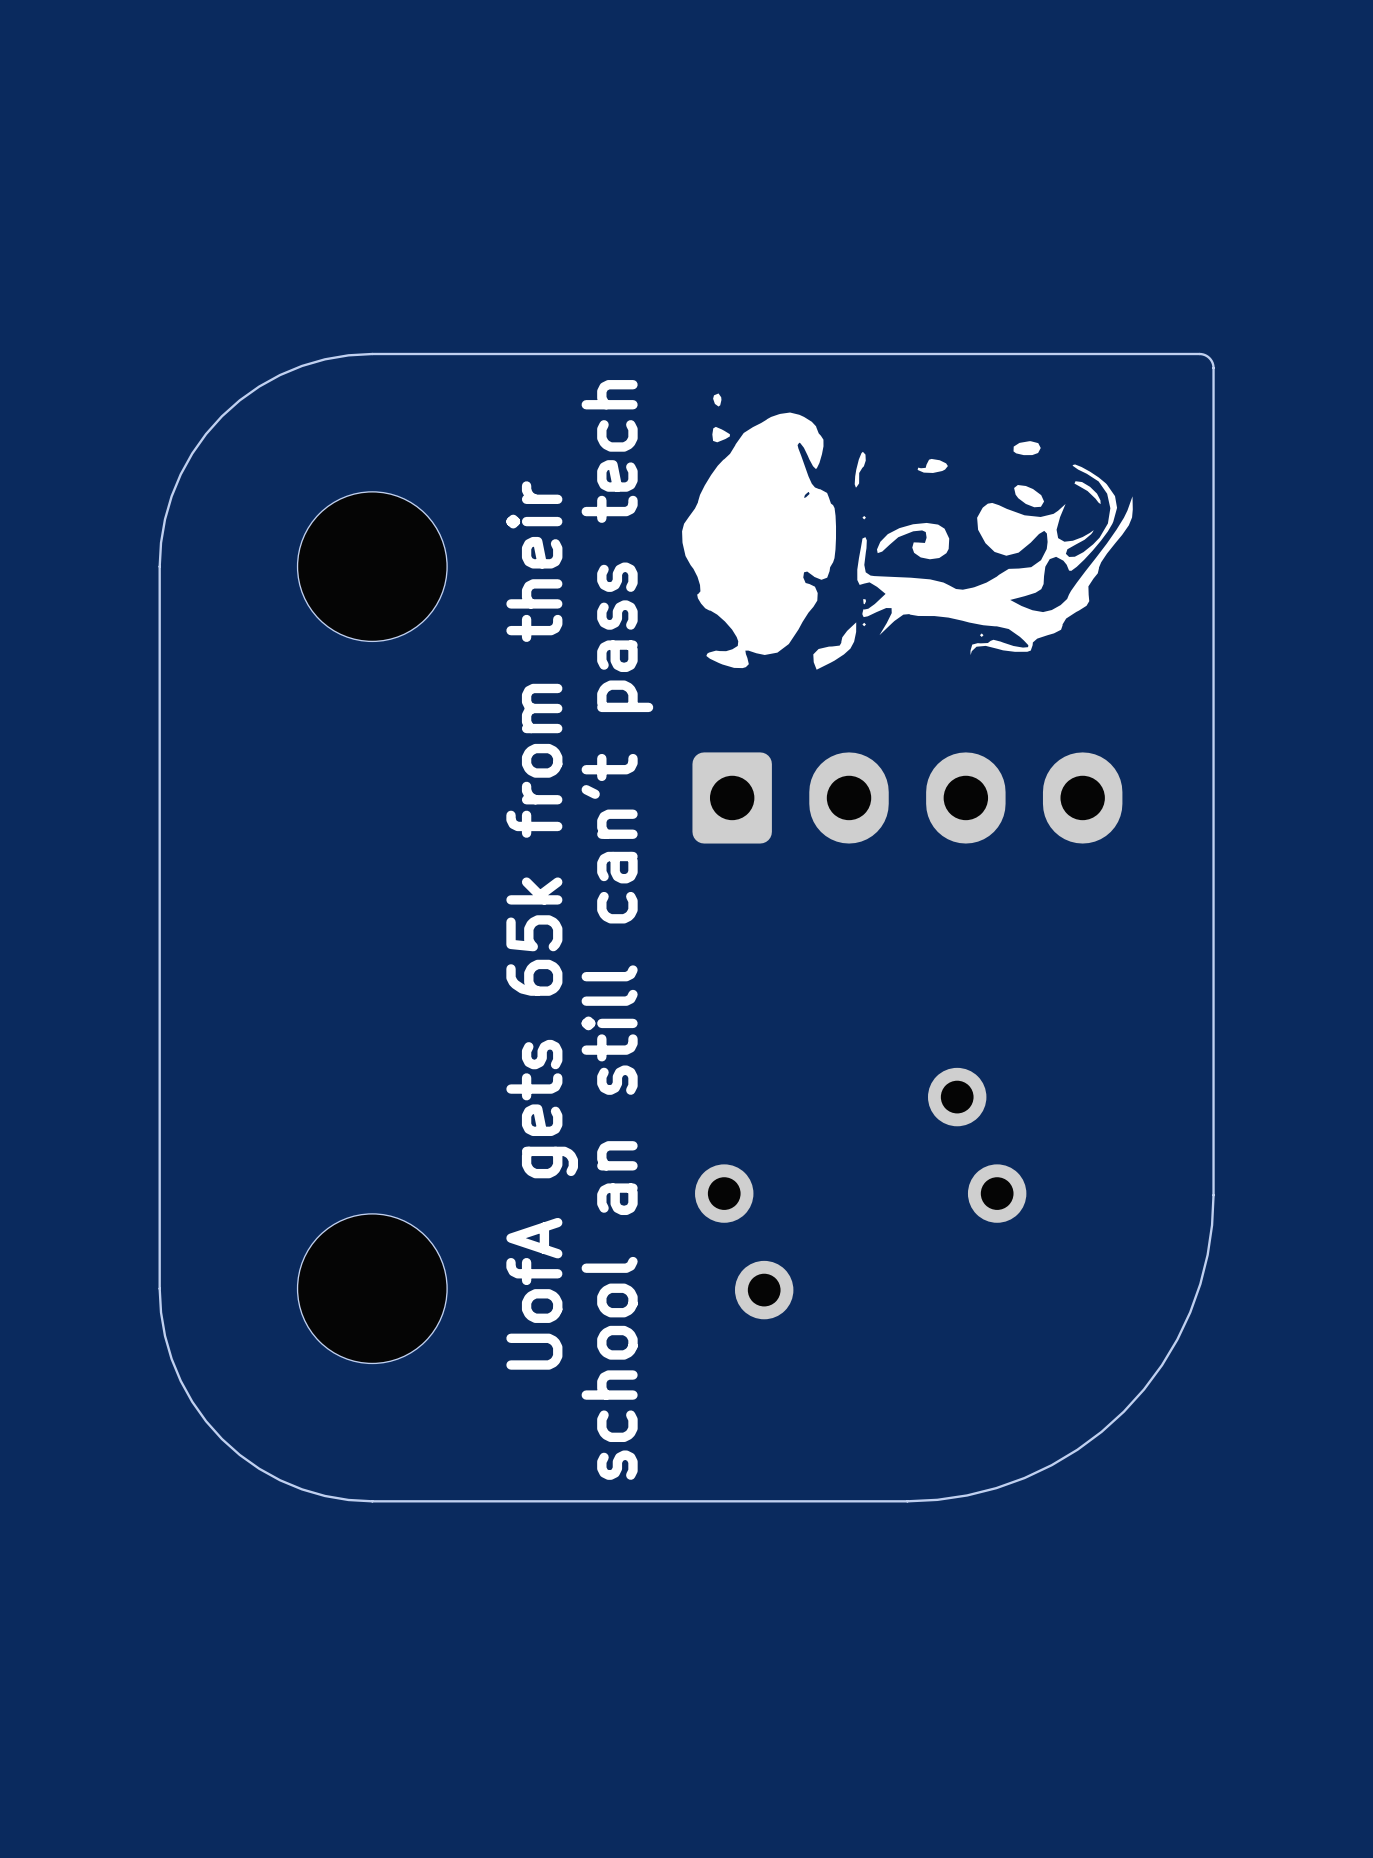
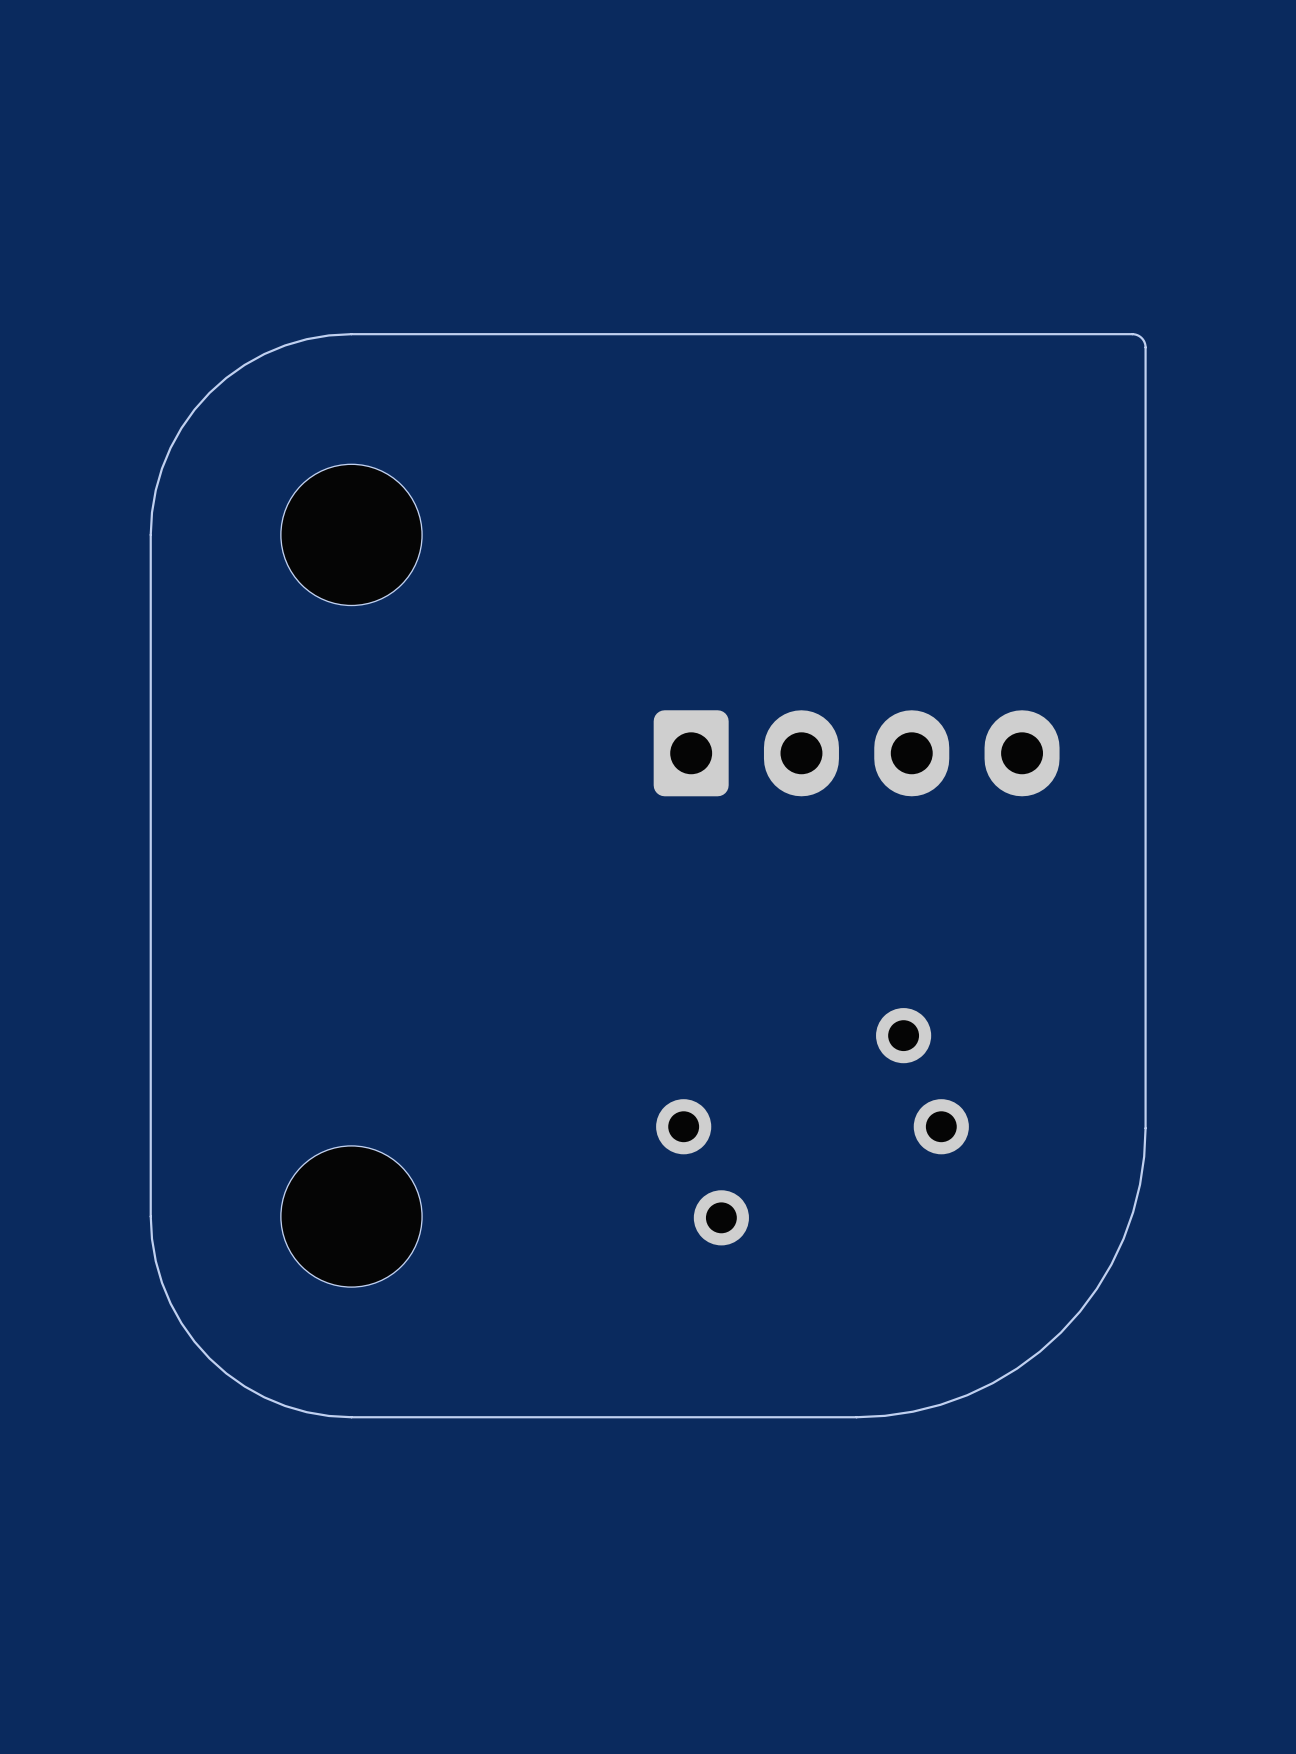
drawing: [682, 393, 1133, 670] -> none
text: UofA gets 65k from their (542, 925) -> none
text: school an still can't pass tech (617, 929) -> none

